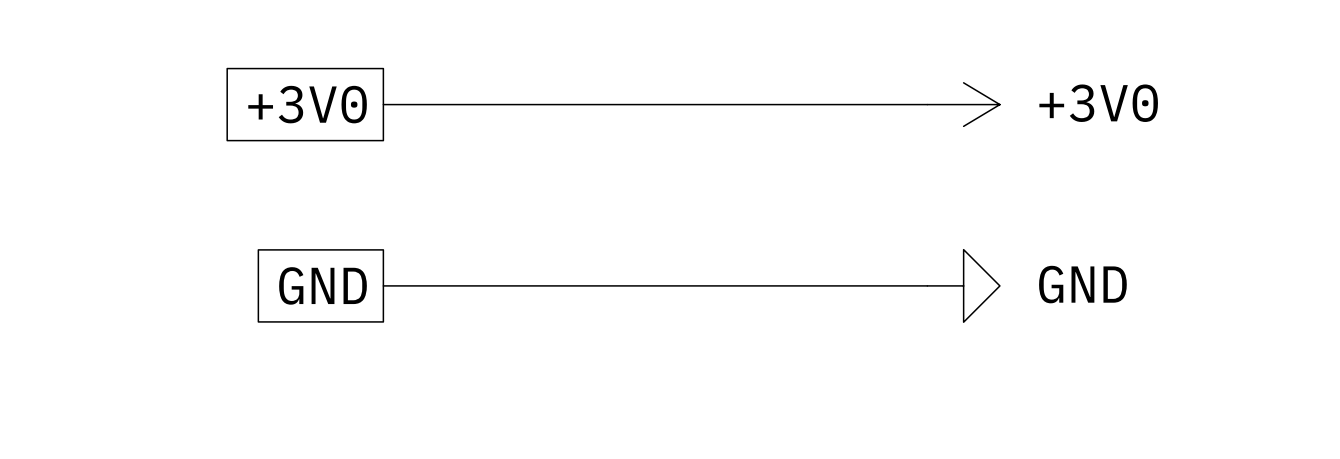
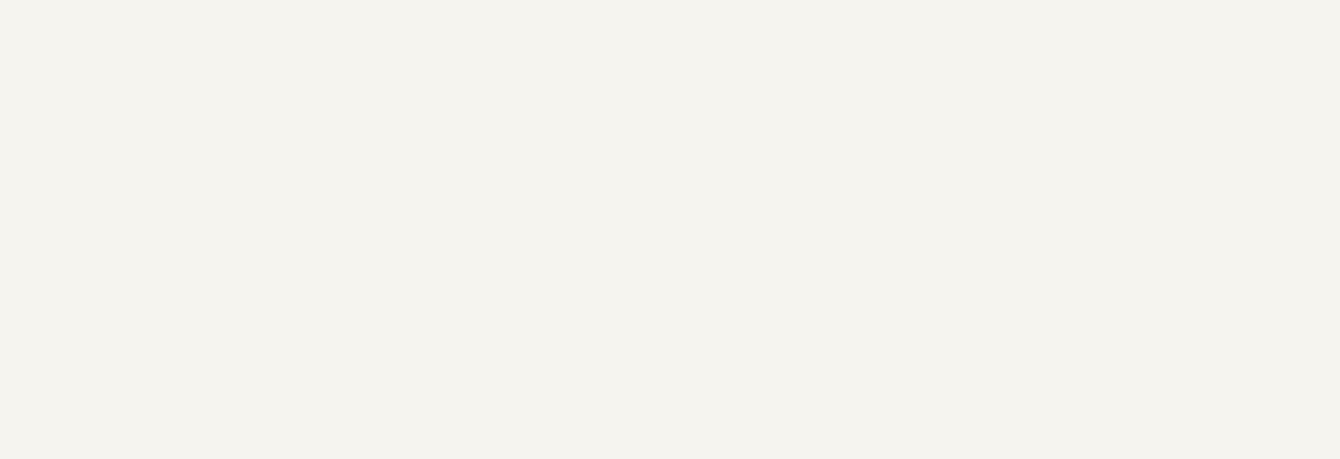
global label: +3V0 (307, 104) -> none
wire: (383, 104) (927, 104) -> none
power symbol: +3V0 (963, 104) -> none
global label: GND (323, 285) -> none
wire: (383, 285) (927, 285) -> none
power symbol: GND (963, 285) -> none

